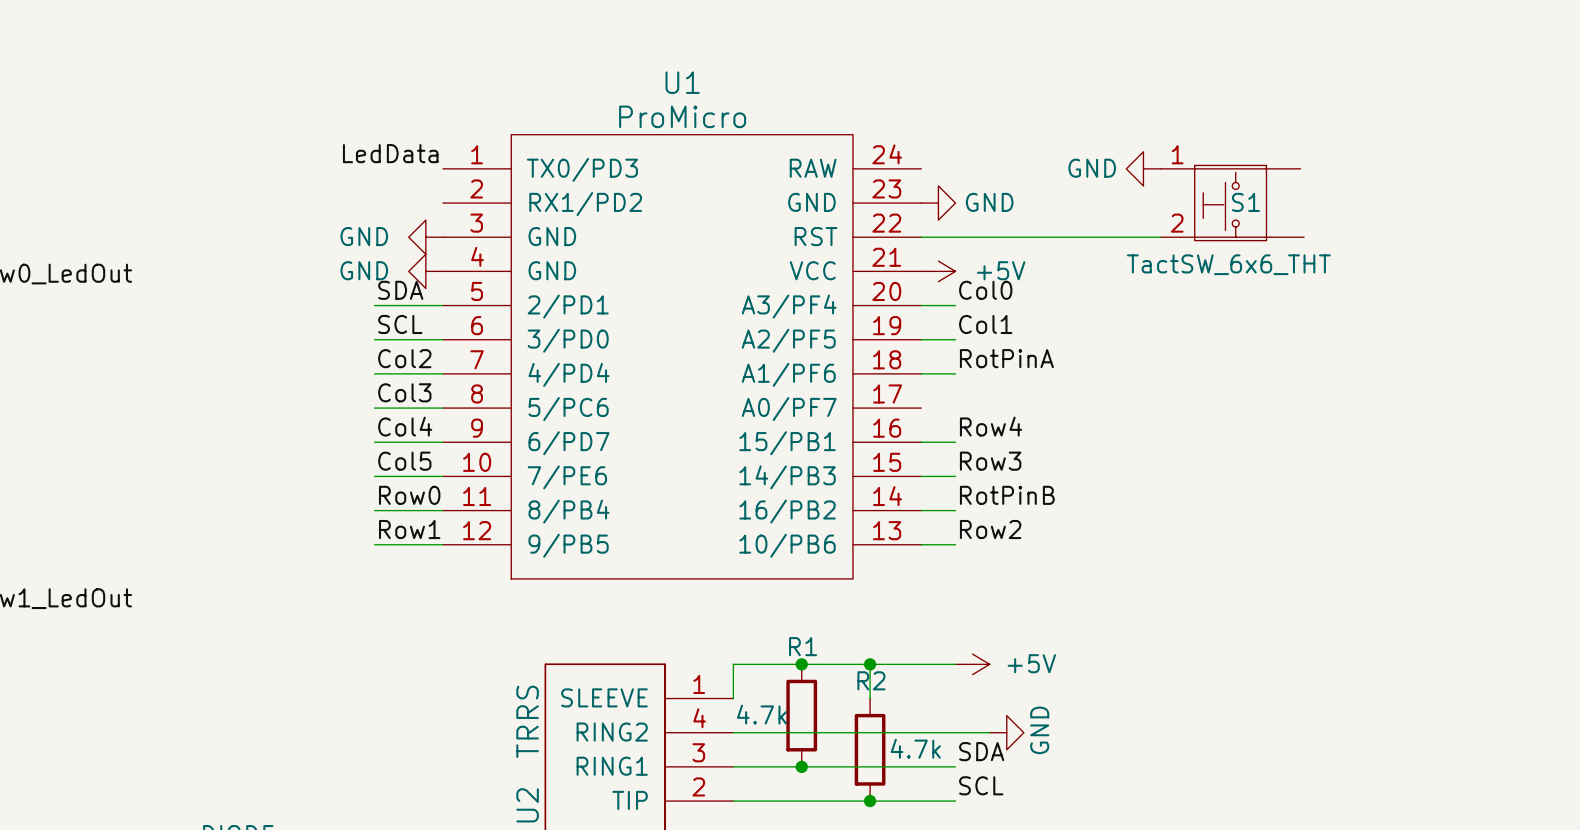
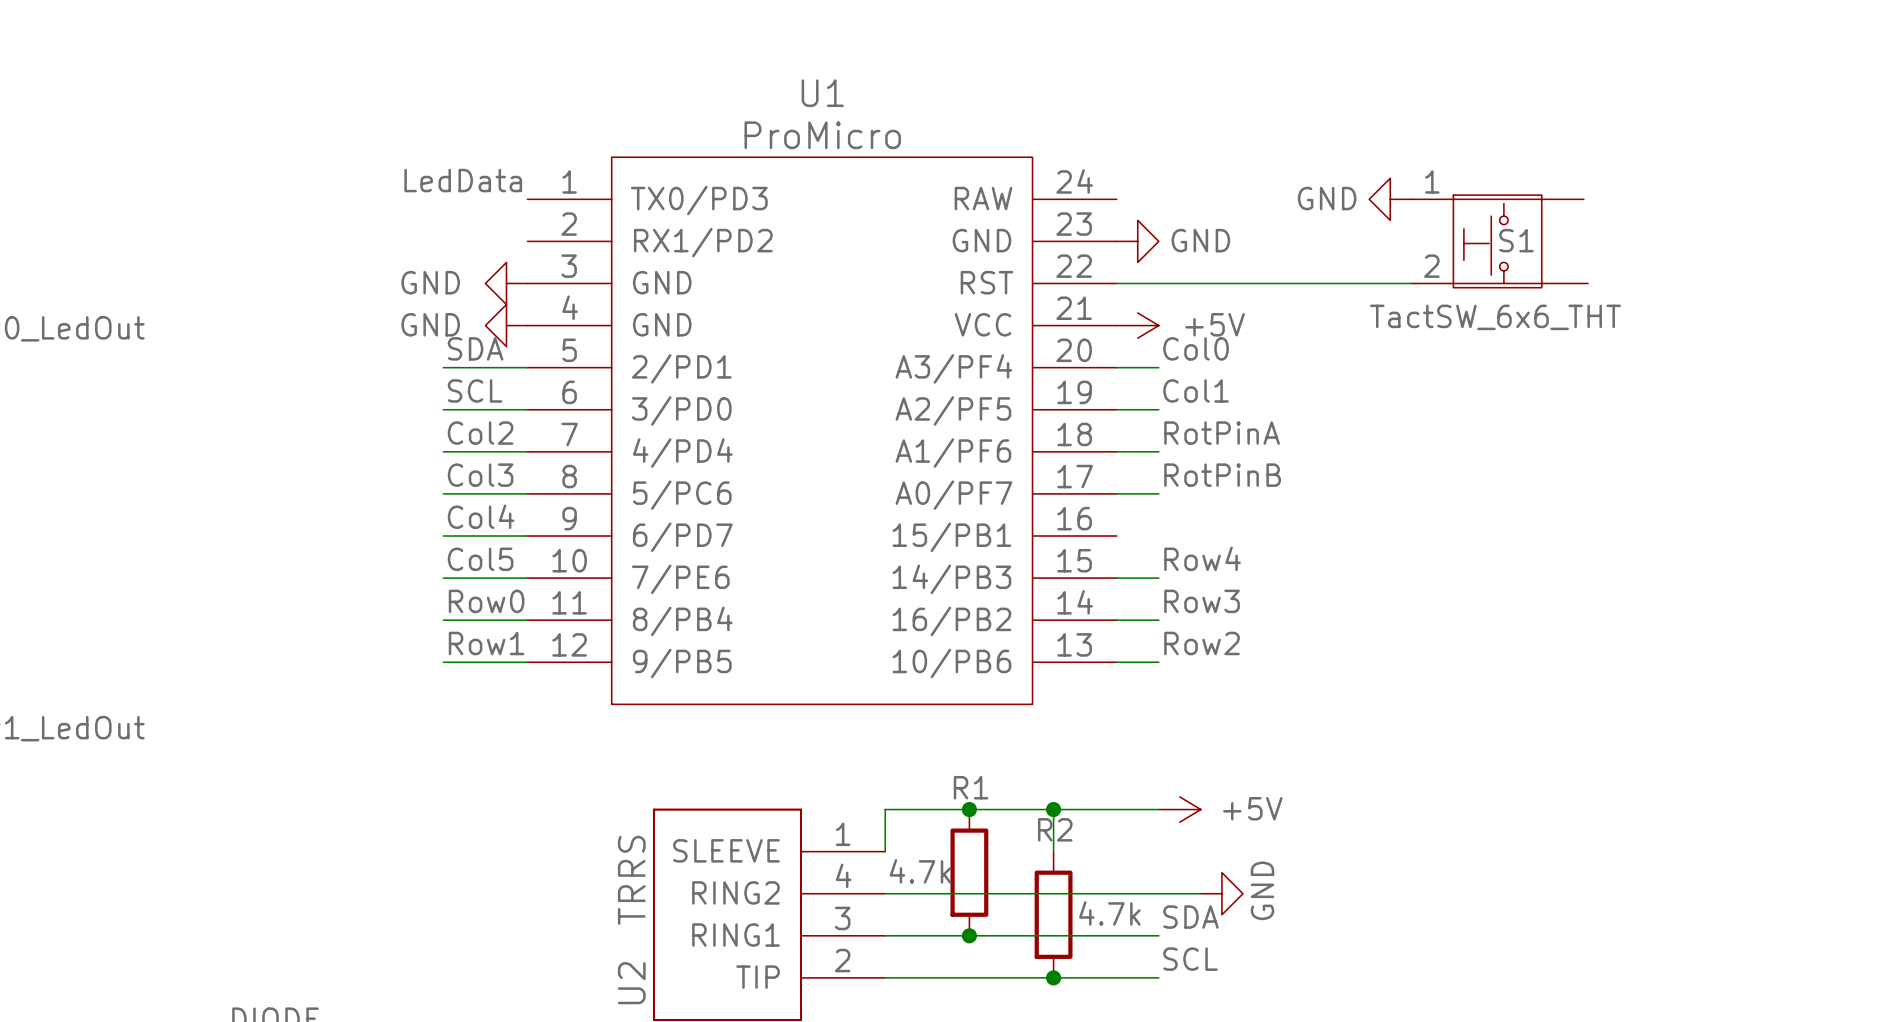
label: none -> RotPinB (1222, 475)
label: Row4 (991, 426) -> none
wire: (921, 442) (955, 442) -> (1116, 493) (1158, 493)
label: Row3 (990, 461) -> Row4 (1202, 558)
label: RotPinB (1007, 495) -> Row3 (1202, 601)

